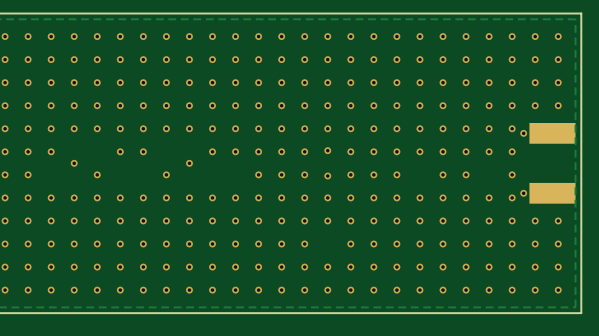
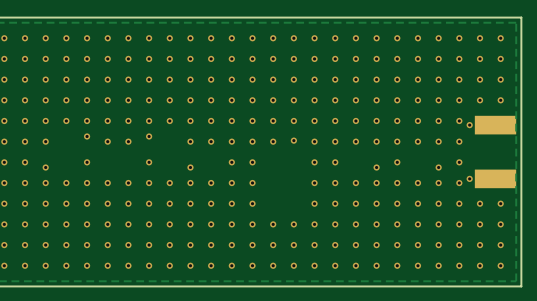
via: none -> (87, 136)
via: none -> (149, 136)
via: (74, 163) -> none
via: (189, 163) -> none
via: (304, 174) -> none
via: (396, 174) -> none
via: (466, 174) -> none
via: (327, 176) -> none
via: none -> (45, 167)
via: none -> (190, 167)
via: none -> (376, 167)
via: none -> (438, 167)
via: (304, 197) -> none
via: (327, 197) -> none
via: (304, 220) -> none
via: (327, 220) -> none
via: none -> (293, 224)

